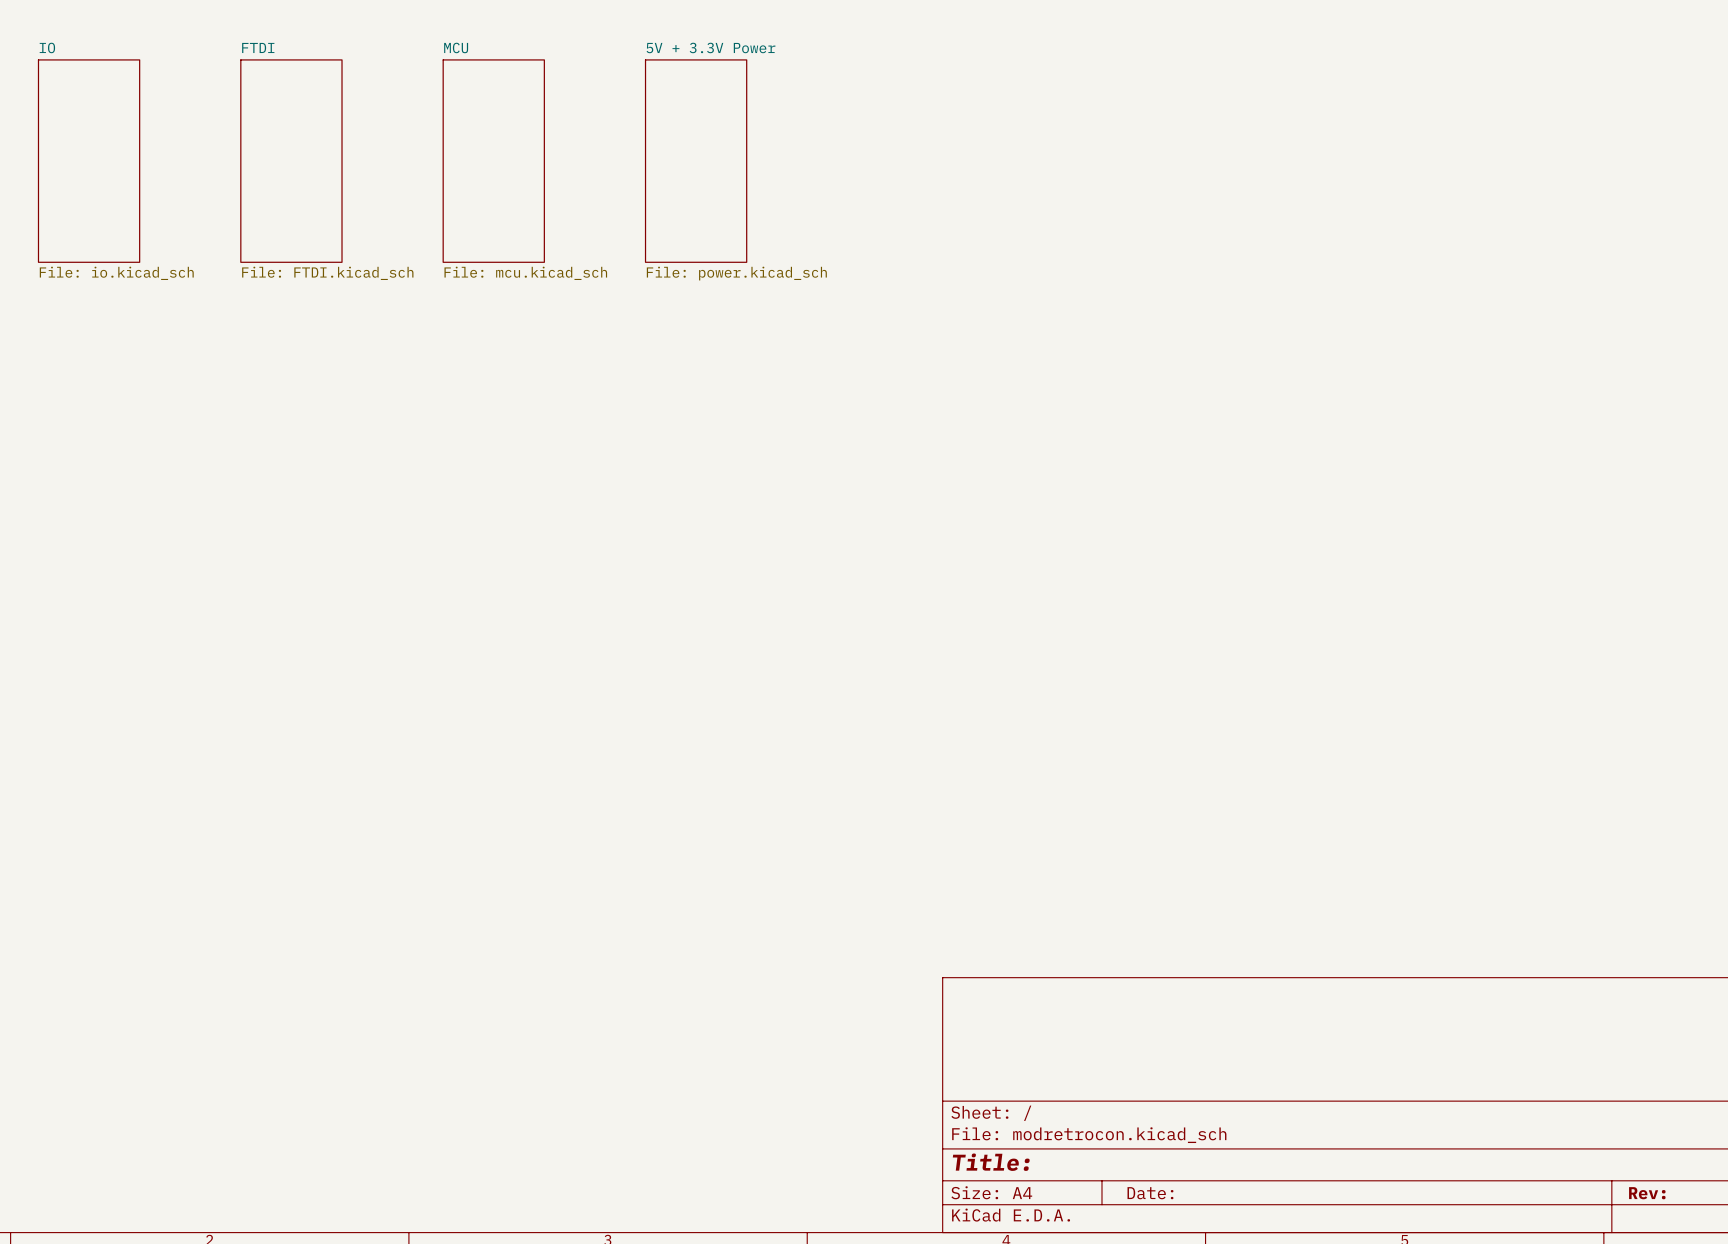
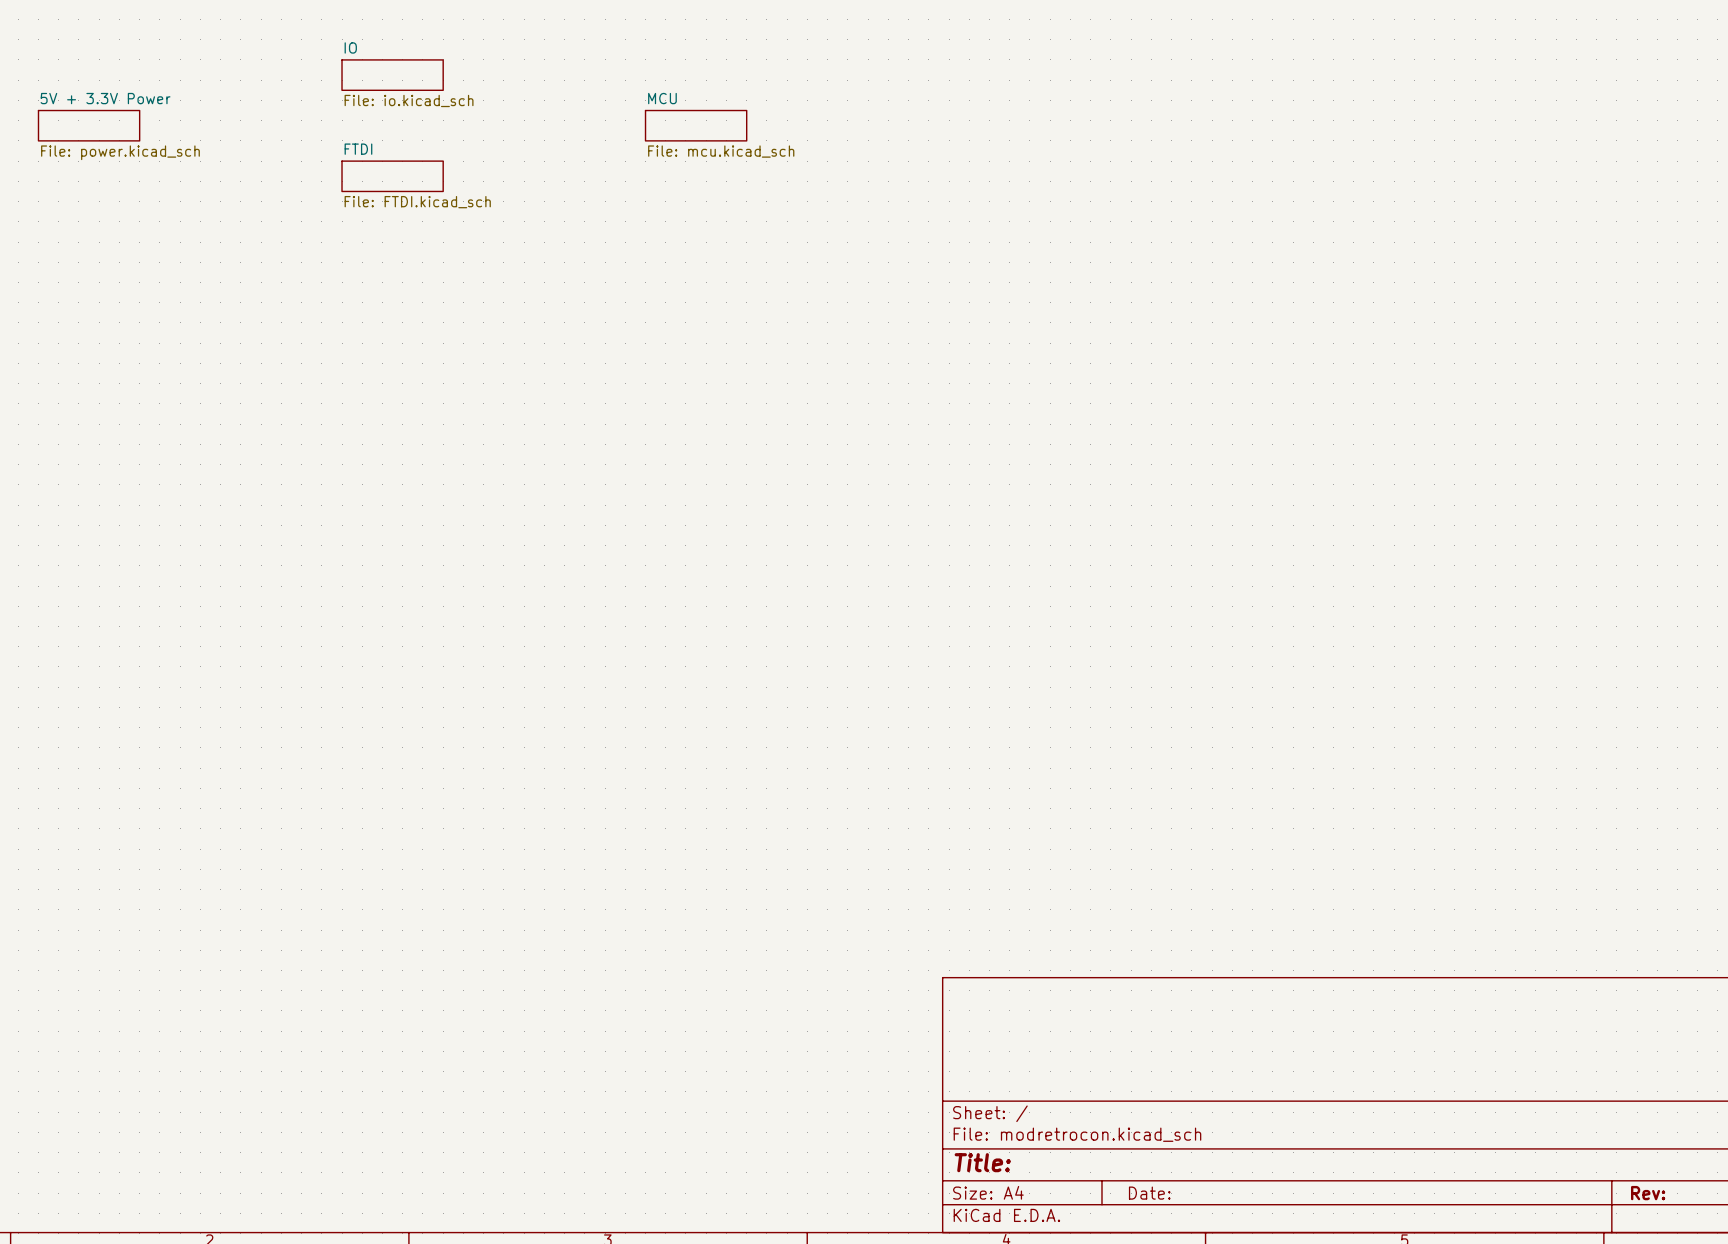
sheet 5V + 3.3V Power name position: 5V + 3.3V Power (710, 47) -> 5V + 3.3V Power (105, 98)
sheet 5V + 3.3V Power shape: [644, 59, 748, 263] -> [37, 109, 141, 142]
sheet IO: none -> File: io.kicad_sch (392, 75)
sheet MCU: none -> File: mcu.kicad_sch (696, 125)
sheet IO: File: io.kicad_sch (89, 161) -> none
sheet FTDI: File: FTDI.kicad_sch (291, 161) -> none
sheet MCU: File: mcu.kicad_sch (493, 161) -> none
sheet FTDI: none -> File: FTDI.kicad_sch (392, 176)
sheet 5V + 3.3V Power value position: File: power.kicad_sch (736, 273) -> File: power.kicad_sch (120, 152)

